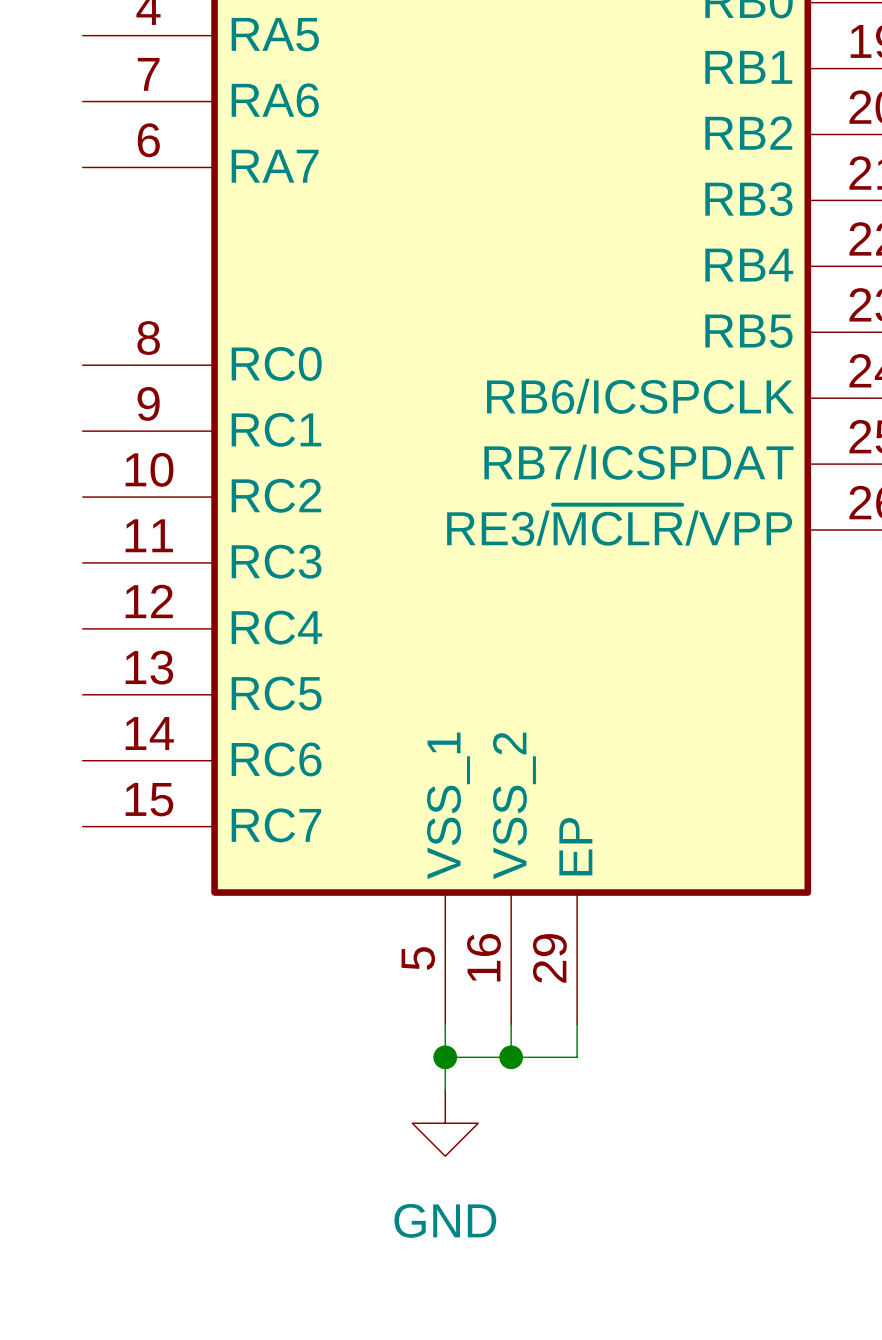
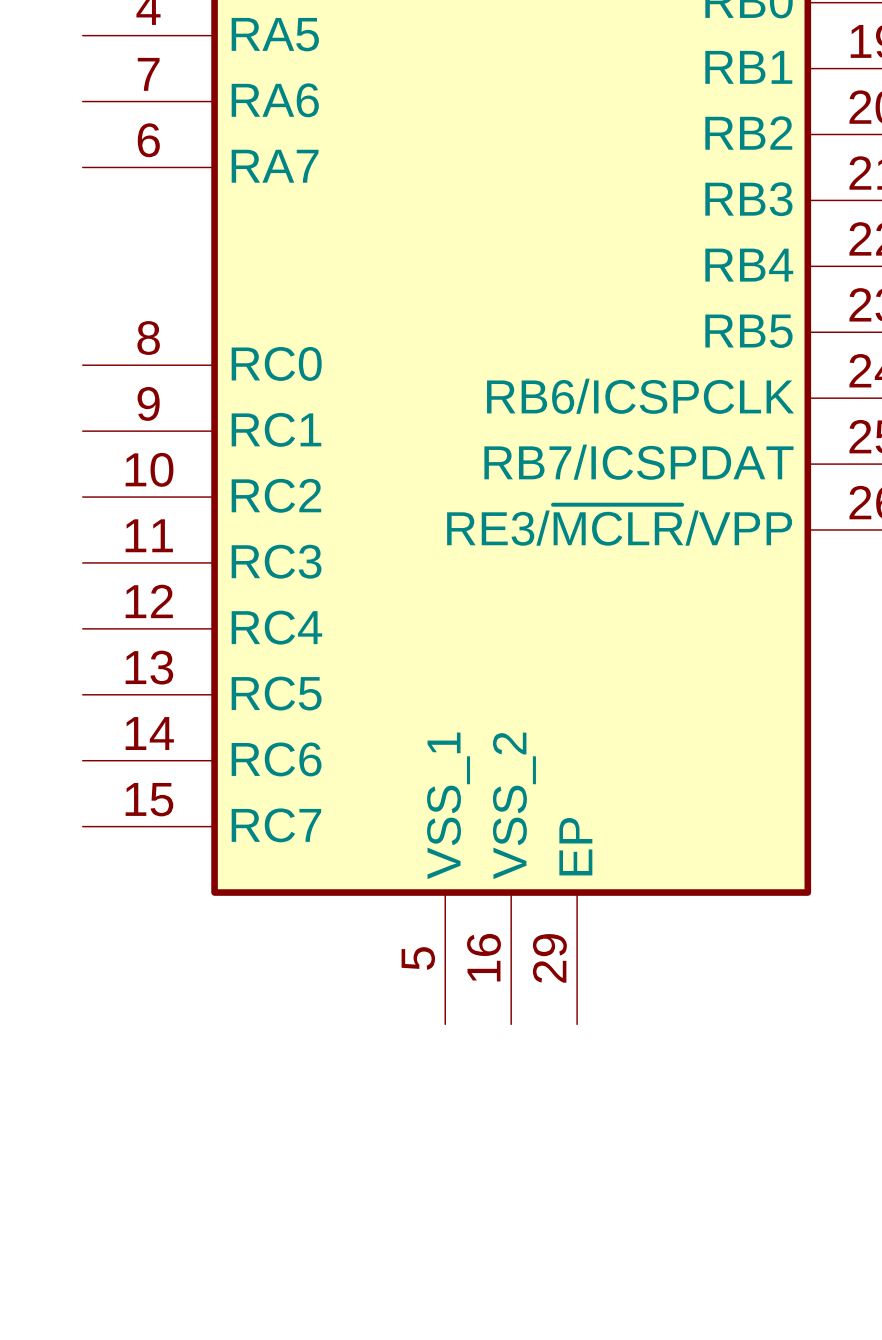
wire: (445, 1024) (445, 1090) -> none
wire: (511, 1024) (511, 1057) -> none
wire: (577, 1024) (577, 1057) (445, 1057) -> none
junction: (445, 1057) -> none
junction: (511, 1057) -> none
power symbol: GND (445, 1123) -> none

